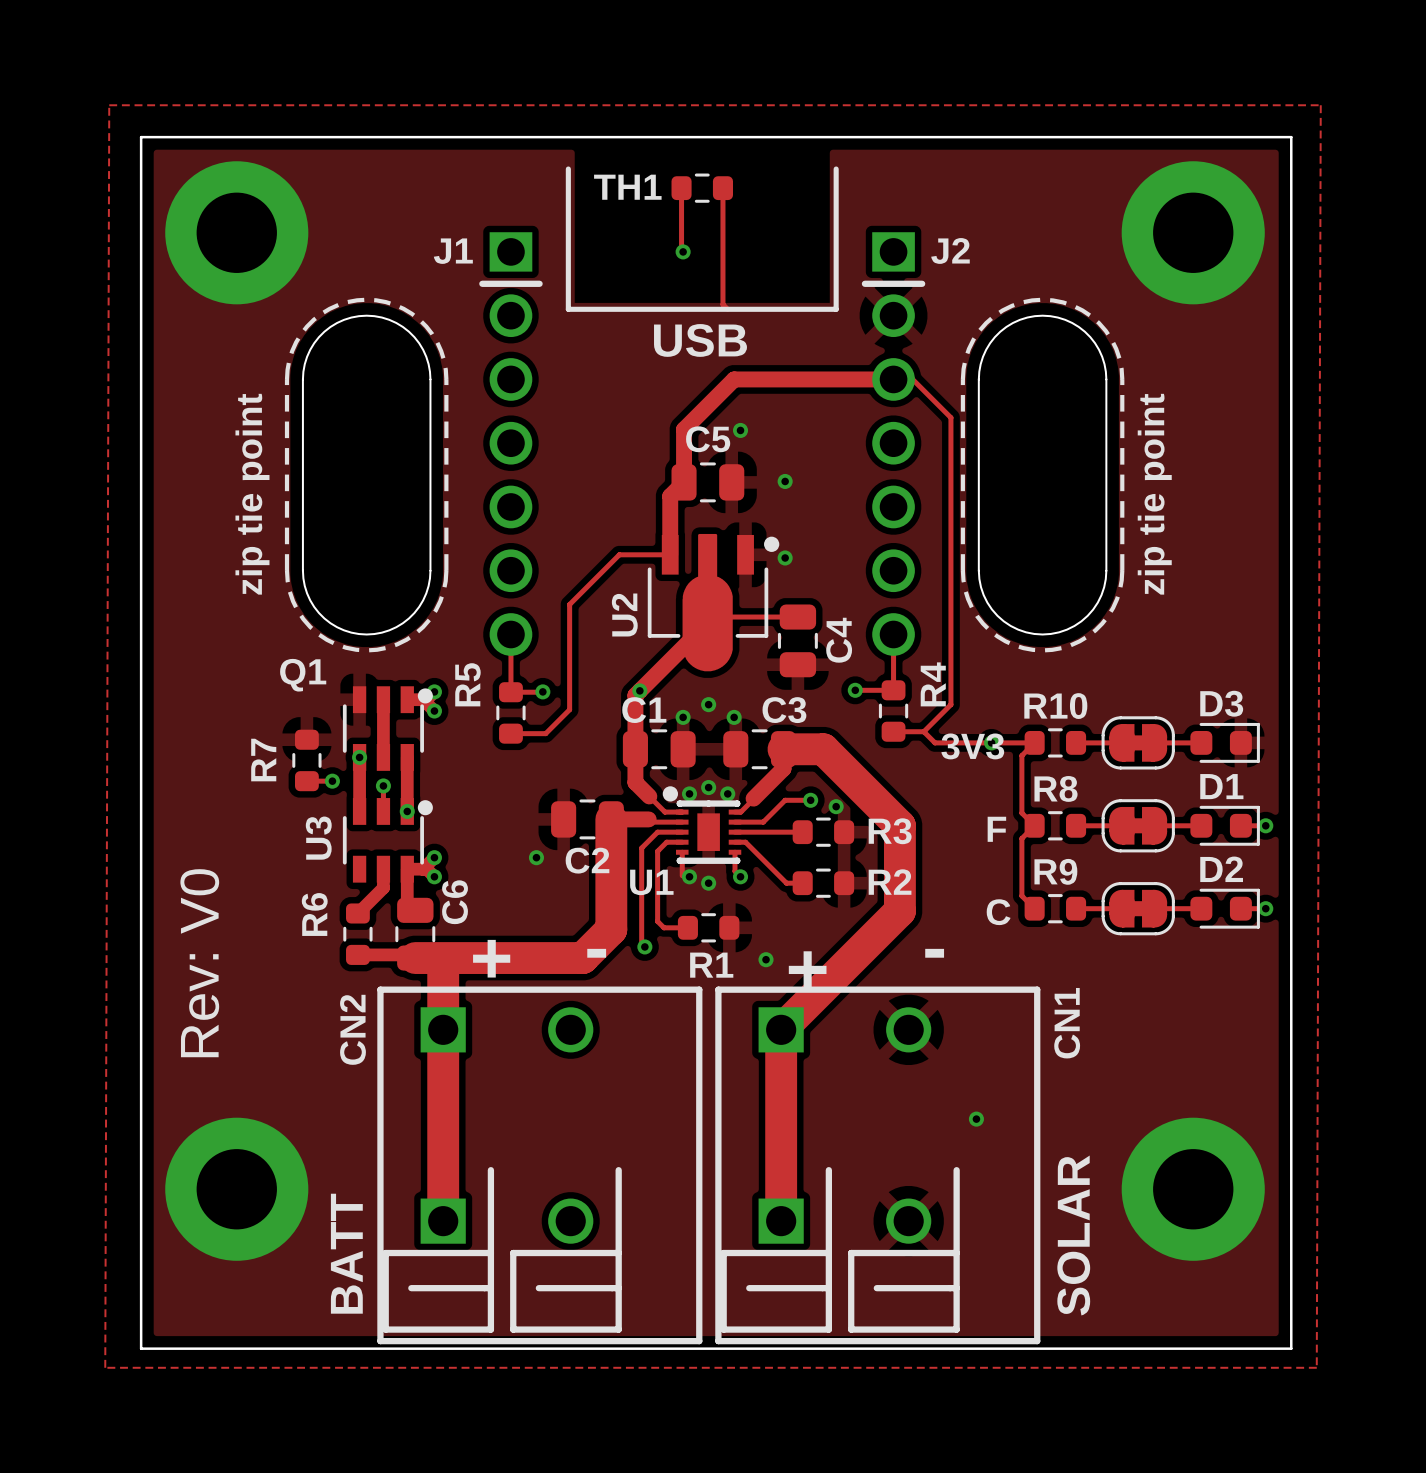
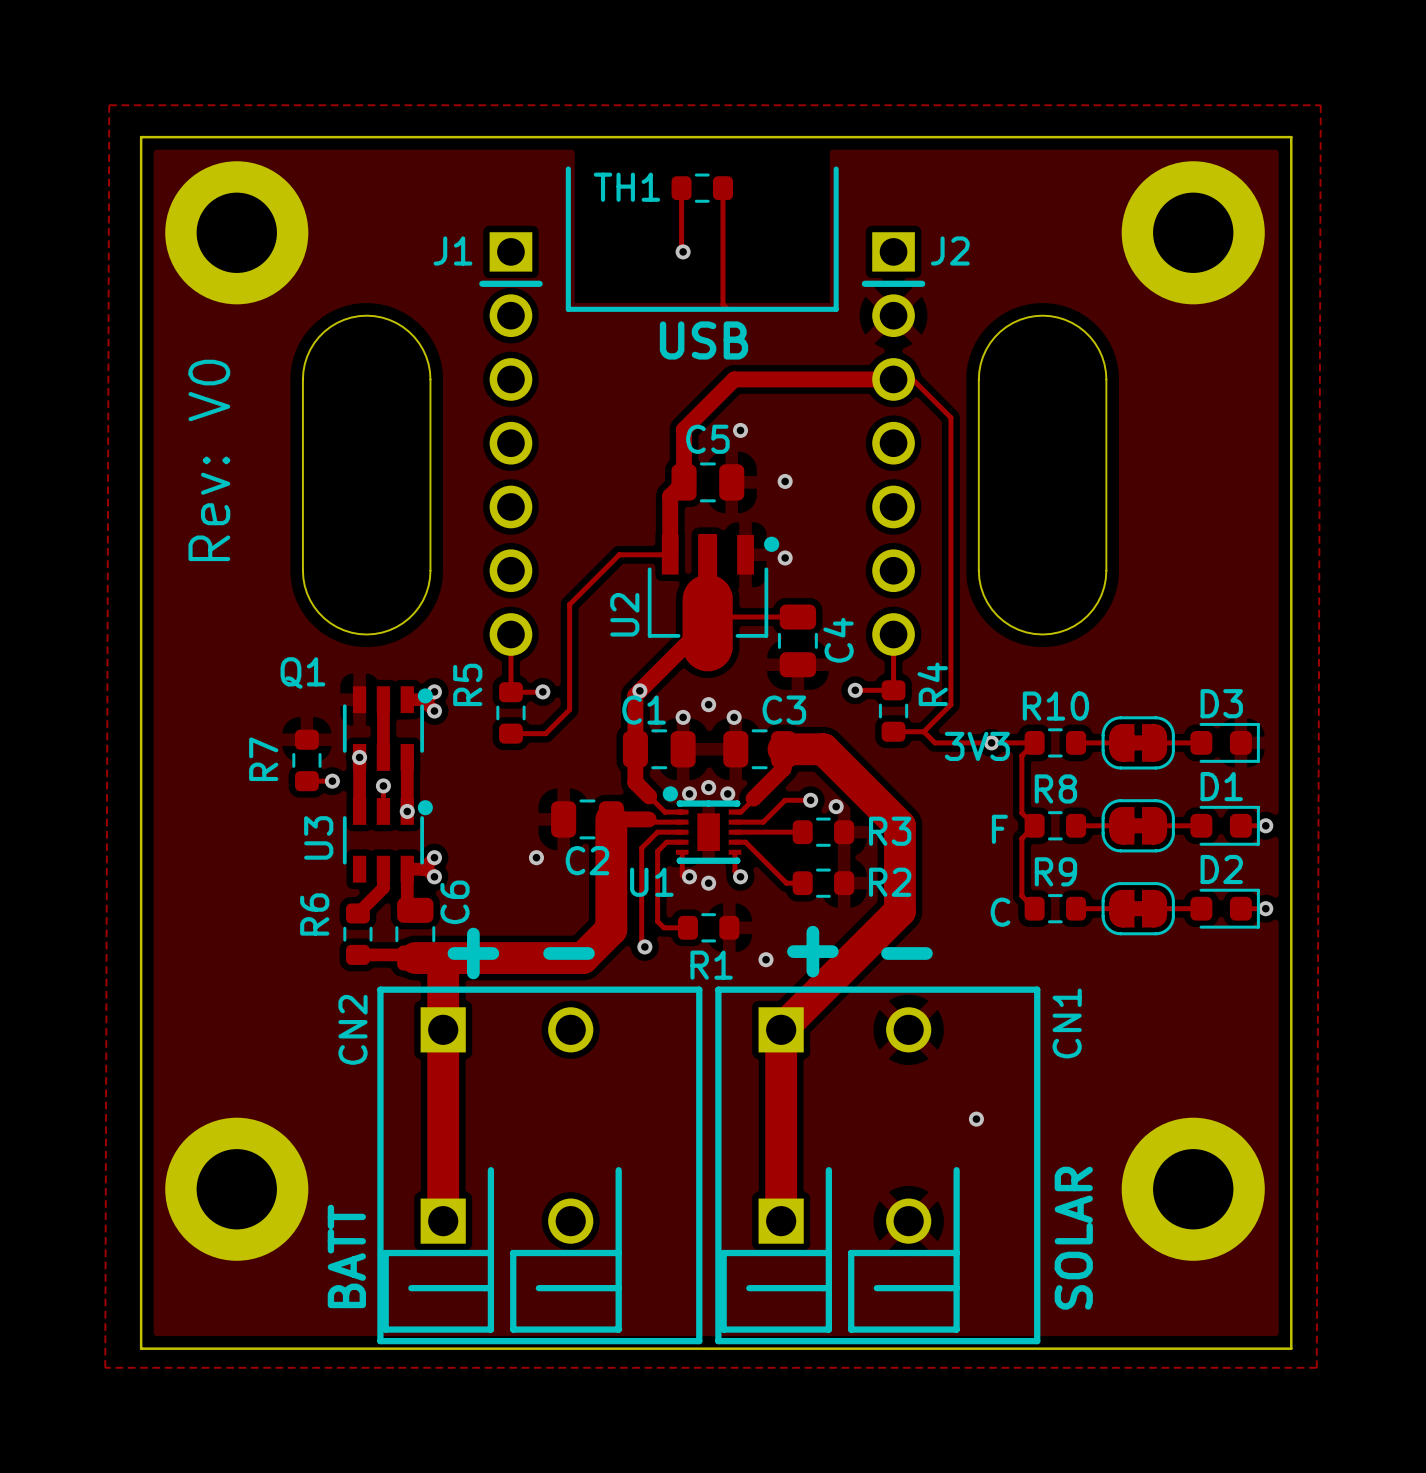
line: (286, 379) (286, 570) (293, 601) (310, 627) (336, 644) (366, 650) (397, 644) (415, 633) (429, 619) (440, 601) (445, 581) (446, 379) (441, 351) (432, 334) (411, 313) (385, 302) (357, 300) (329, 308) (307, 326) (292, 351) (286, 379) -> none
line: (962, 379) (962, 570) (968, 599) (976, 616) (989, 630) (1014, 645) (1042, 650) (1070, 645) (1087, 636) (1108, 616) (1117, 599) (1121, 580) (1122, 379) (1116, 348) (1098, 323) (1073, 305) (1042, 299) (1021, 302) (994, 316) (979, 330) (965, 358) (962, 379) -> none
text: zip tie point (252, 494) -> none
text: zip tie point (1154, 494) -> none
text position: Rev: V0 (199, 963) -> Rev: V0 (209, 460)

